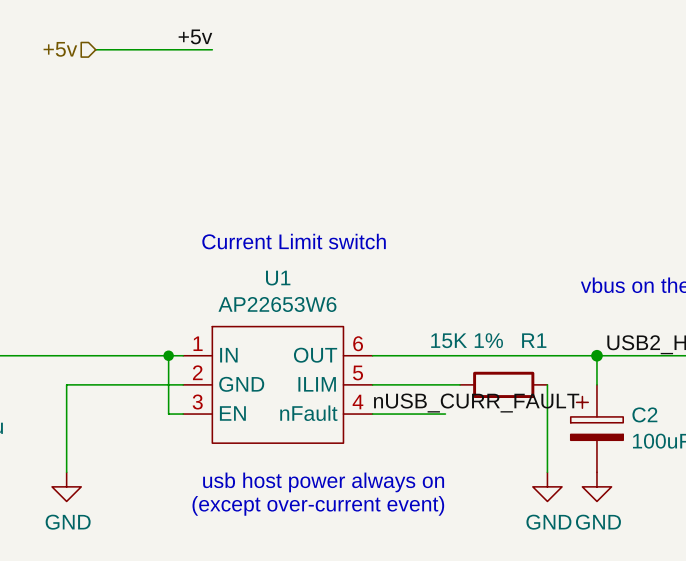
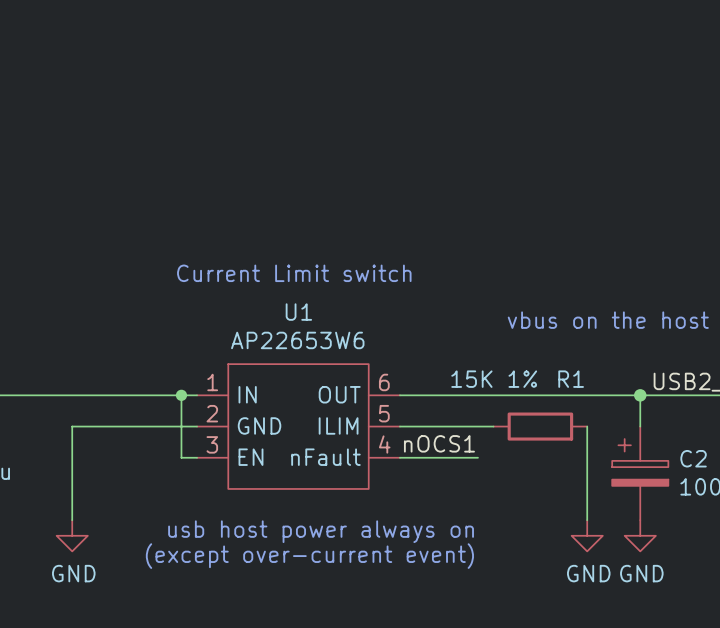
label: +5v (195, 36) -> none
hierarchical label: +5v (60, 49) -> none
wire: (95, 49) (212, 49) -> none
label: nUSB_CURR_FAULT (476, 403) -> nOCS1 (439, 443)

